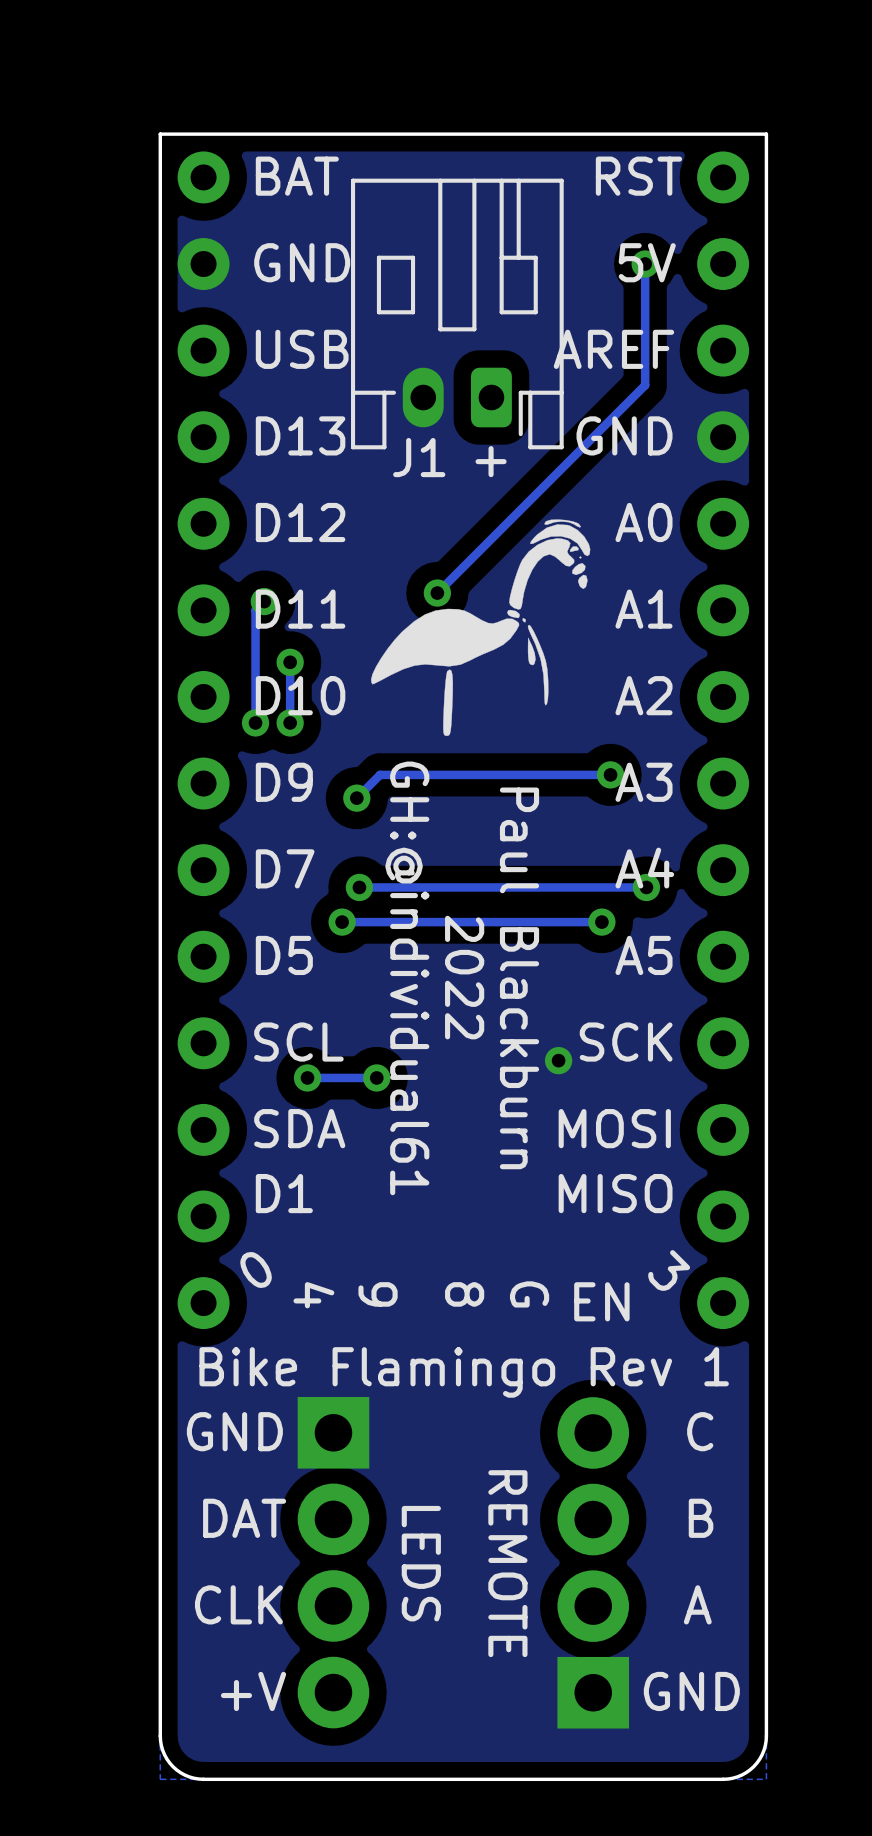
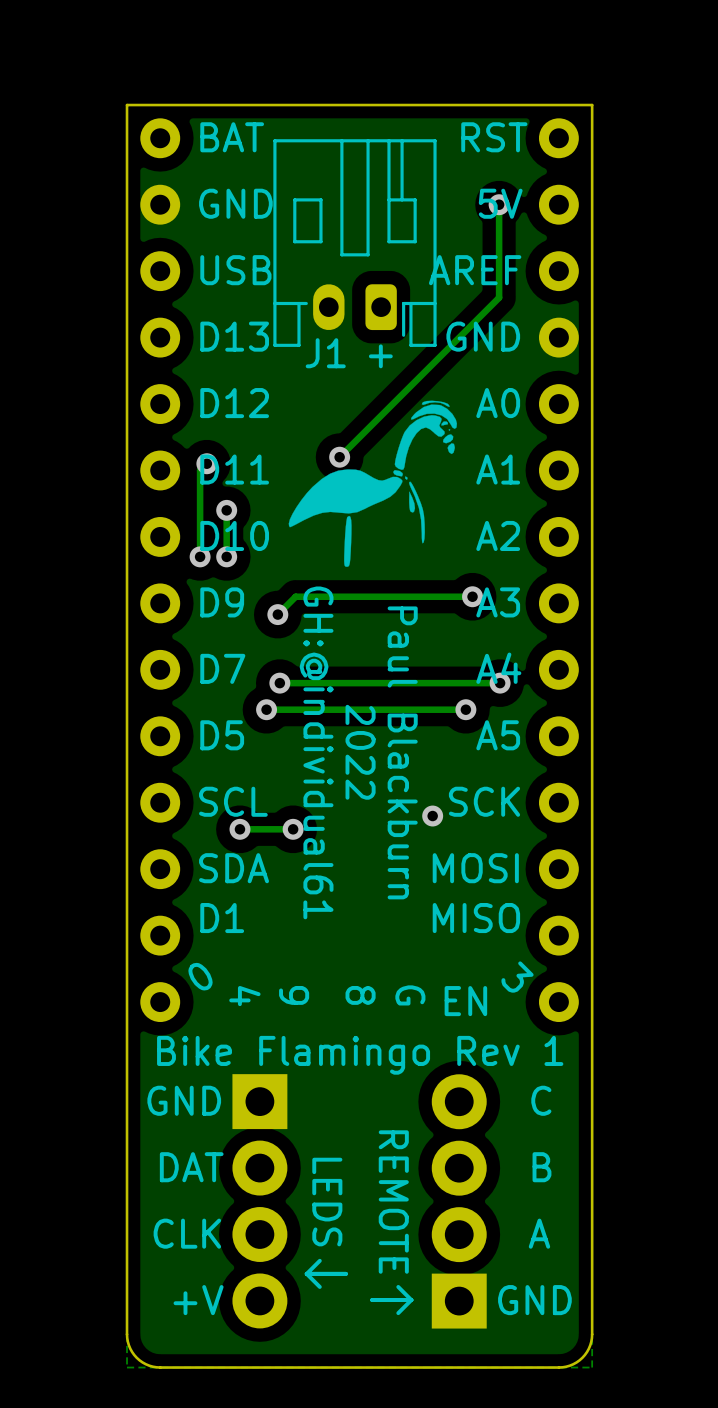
line: none -> (319, 1260) (306, 1273)
line: none -> (306, 1273) (319, 1286)
line: none -> (398, 1286) (411, 1300)
line: none -> (411, 1300) (398, 1313)

